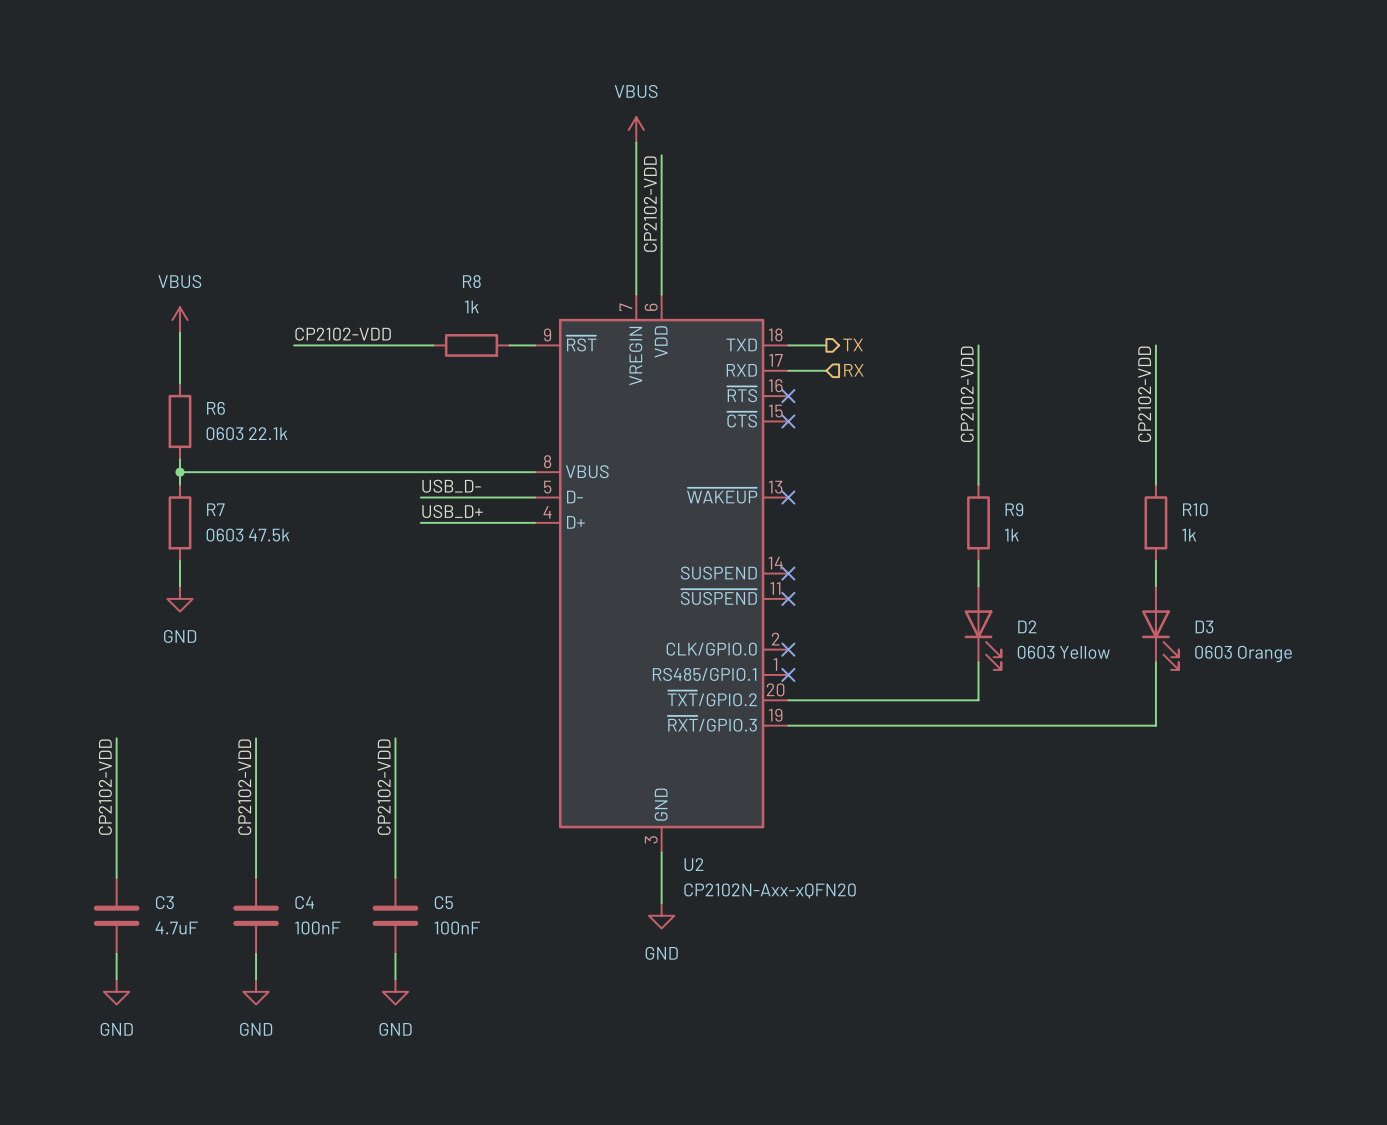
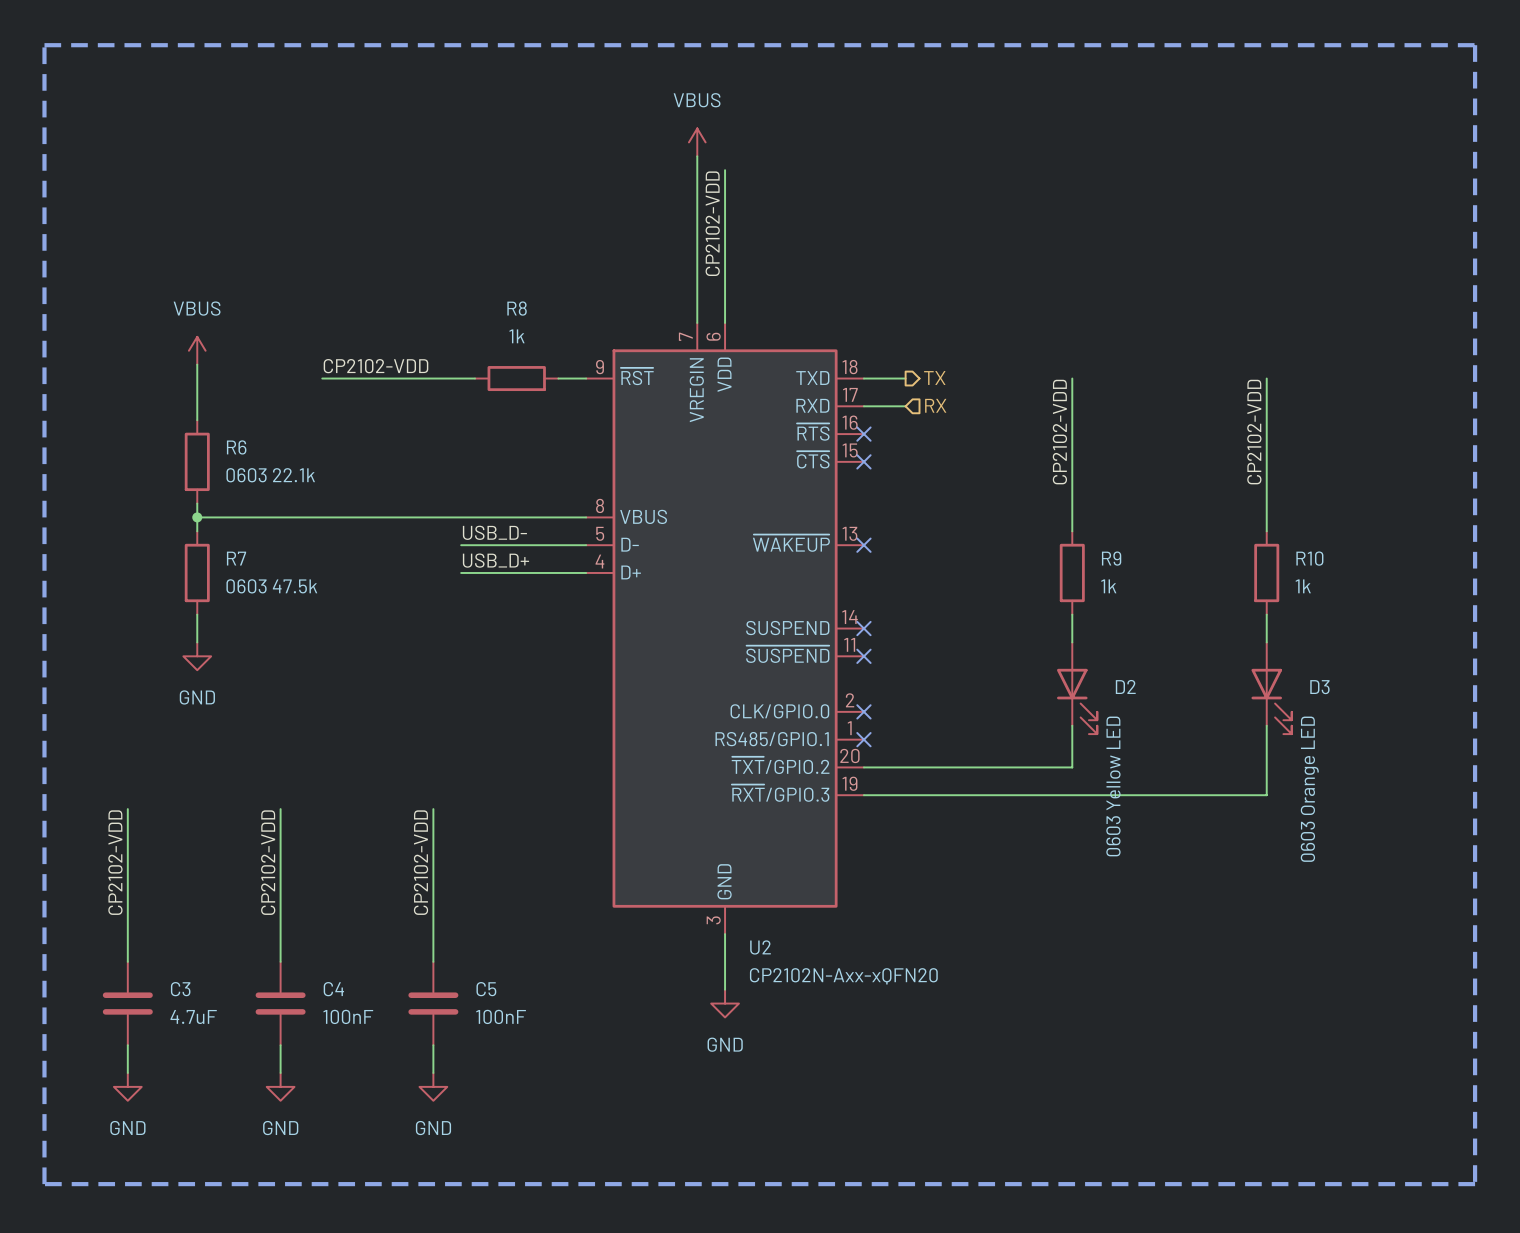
line: none -> (44, 45) (1475, 45) (1475, 1184) (44, 1184) (44, 45)
D2 value: 0603 Yellow (1063, 652) -> 0603 Yellow LED (1113, 786)
D3 value: 0603 Orange (1243, 654) -> 0603 Orange LED (1309, 789)

